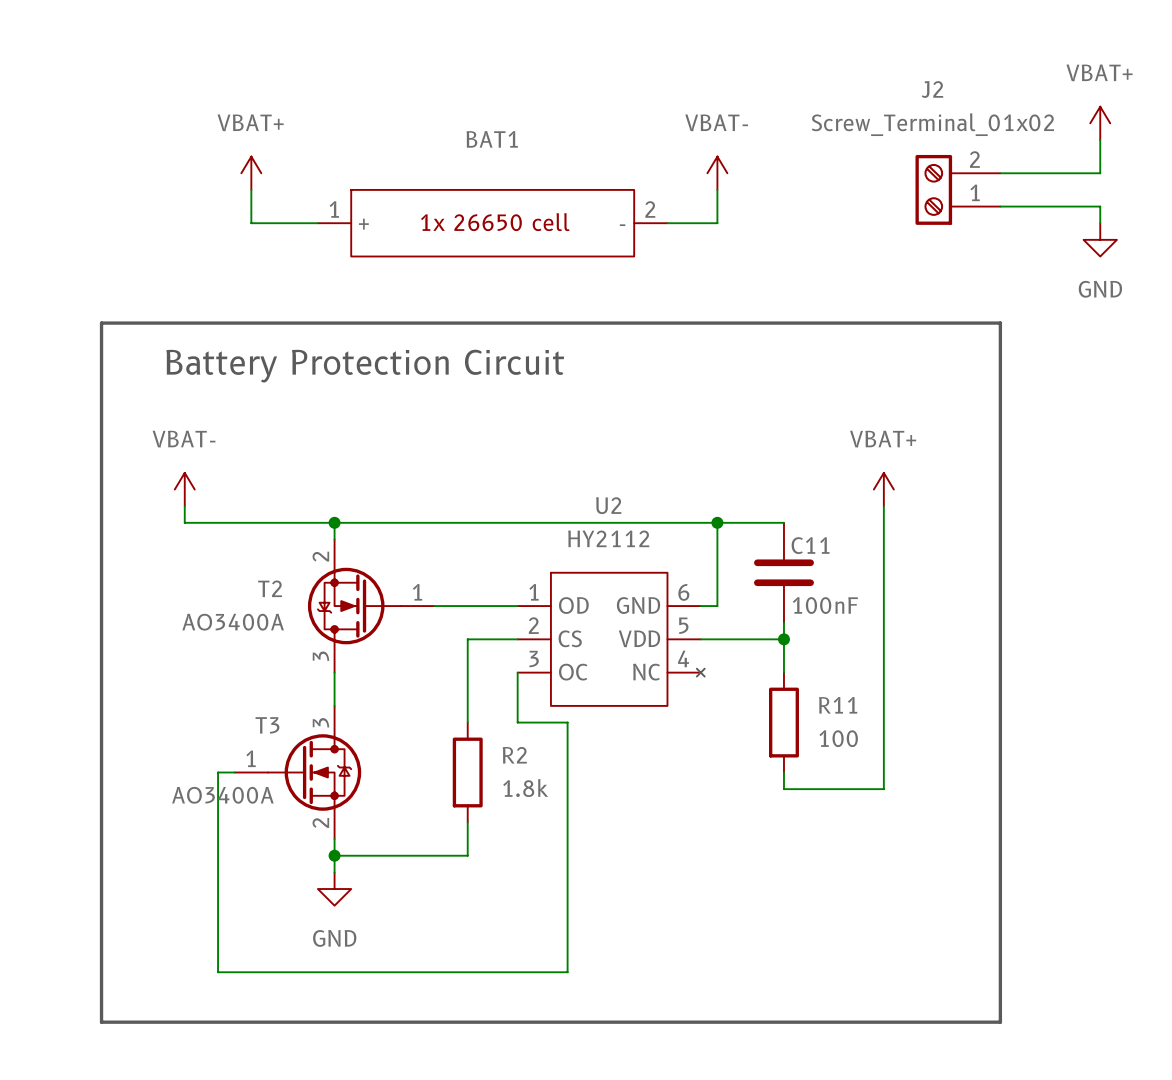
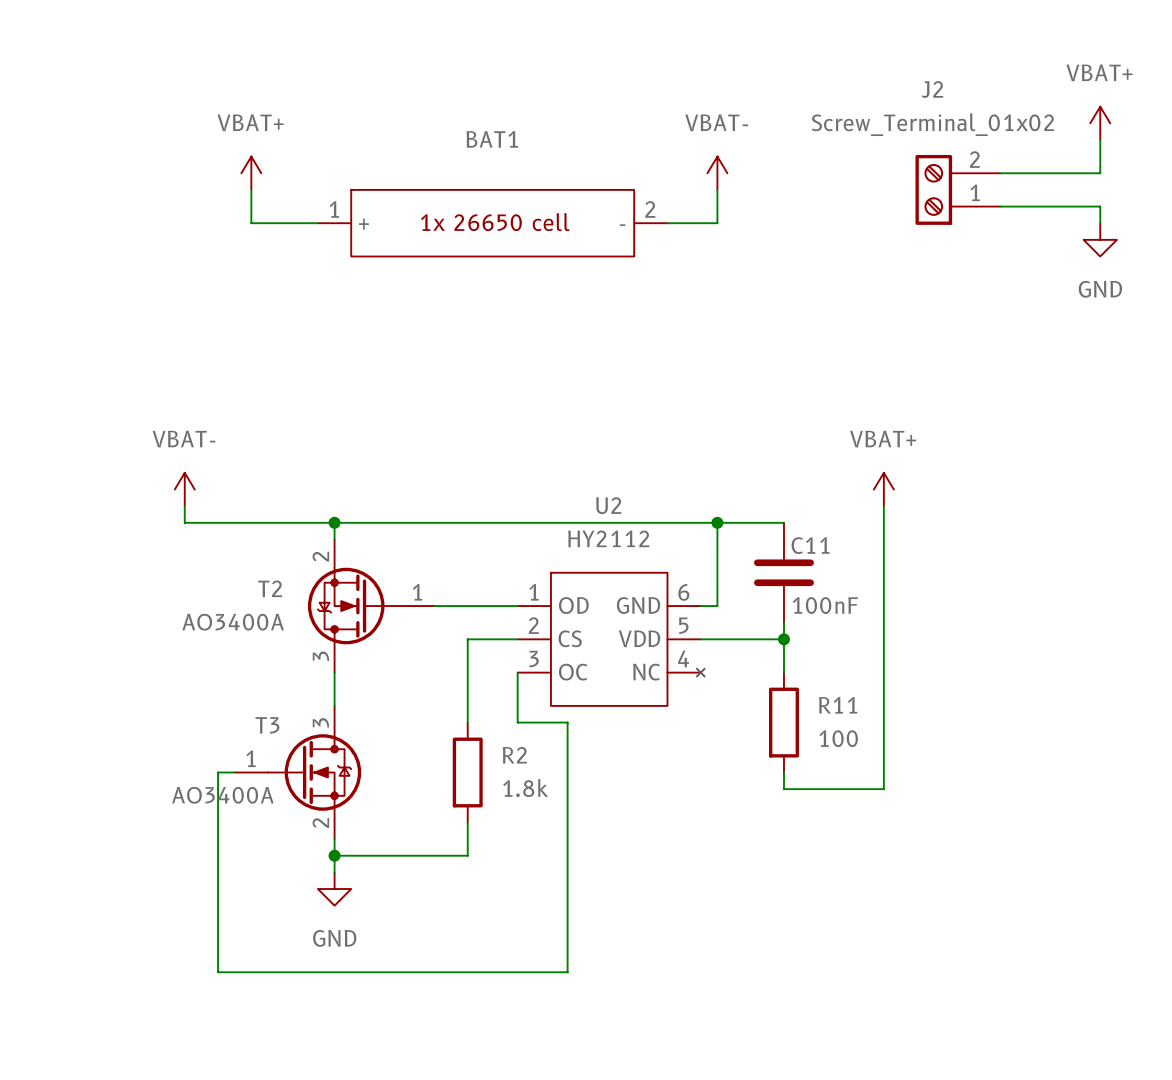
line: (101, 323) (1000, 323) (1000, 1022) (101, 1022) (101, 323) -> none
text: Battery Protection Circuit (365, 366) -> none

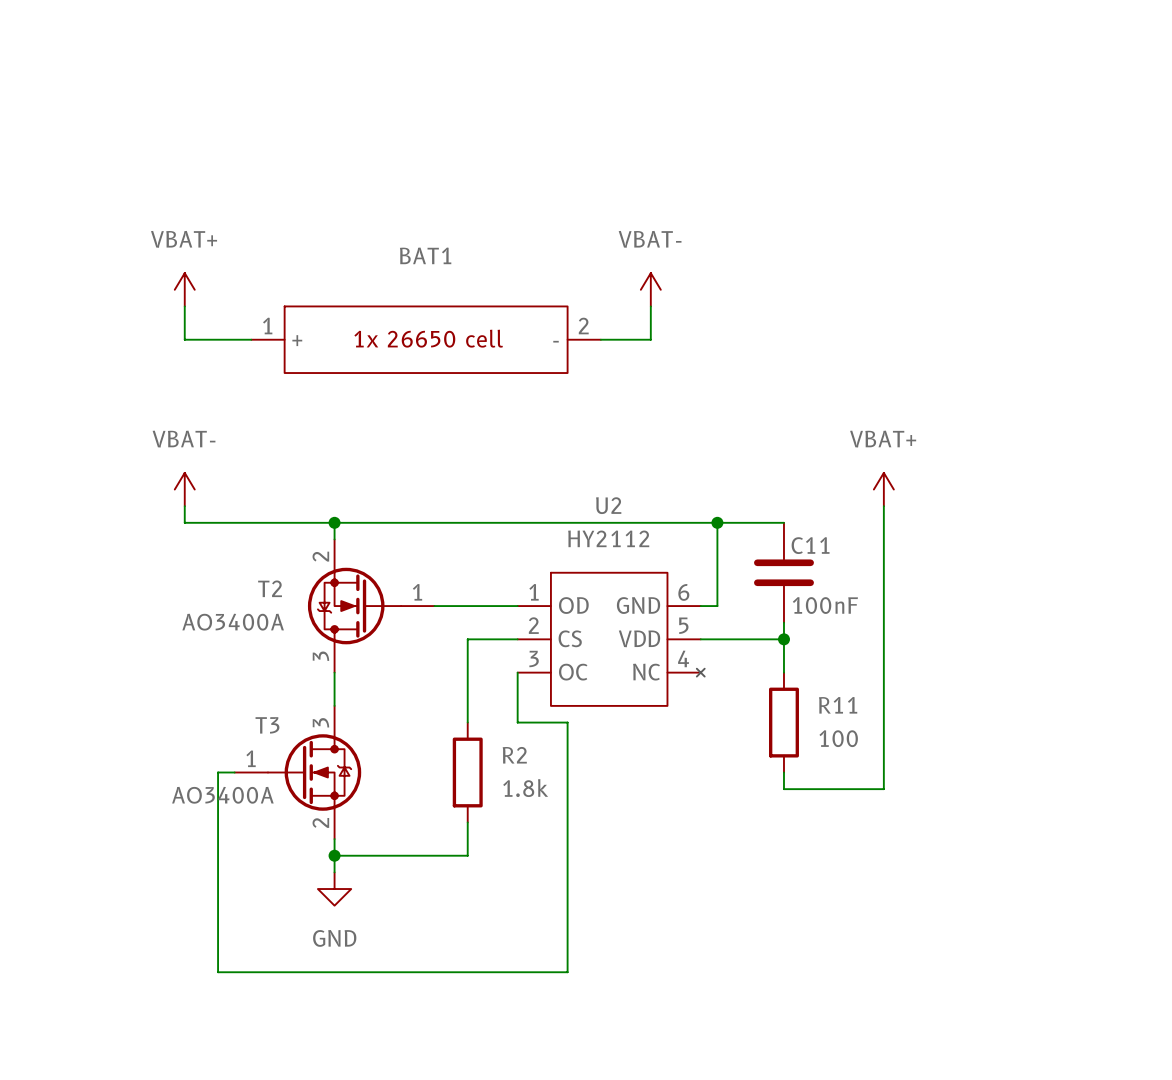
power symbol: VBAT+ (1100, 123) -> none
wire: (1100, 139) (1100, 173) (1000, 173) -> none
power symbol position: VBAT+ (251, 173) -> VBAT+ (184, 289)
power symbol position: VBAT- (717, 173) -> VBAT- (650, 289)
wire: (251, 189) (251, 223) (317, 223) -> (184, 306) (184, 339) (251, 339)
wire: (717, 189) (717, 223) (667, 223) -> (650, 306) (650, 339) (600, 339)
J2: Screw_Terminal_01x02 (957, 189) -> none
wire: (1000, 206) (1100, 206) (1100, 223) -> none
BAT1 position: (492, 223) -> (426, 339)
power symbol: GND (1100, 239) -> none

